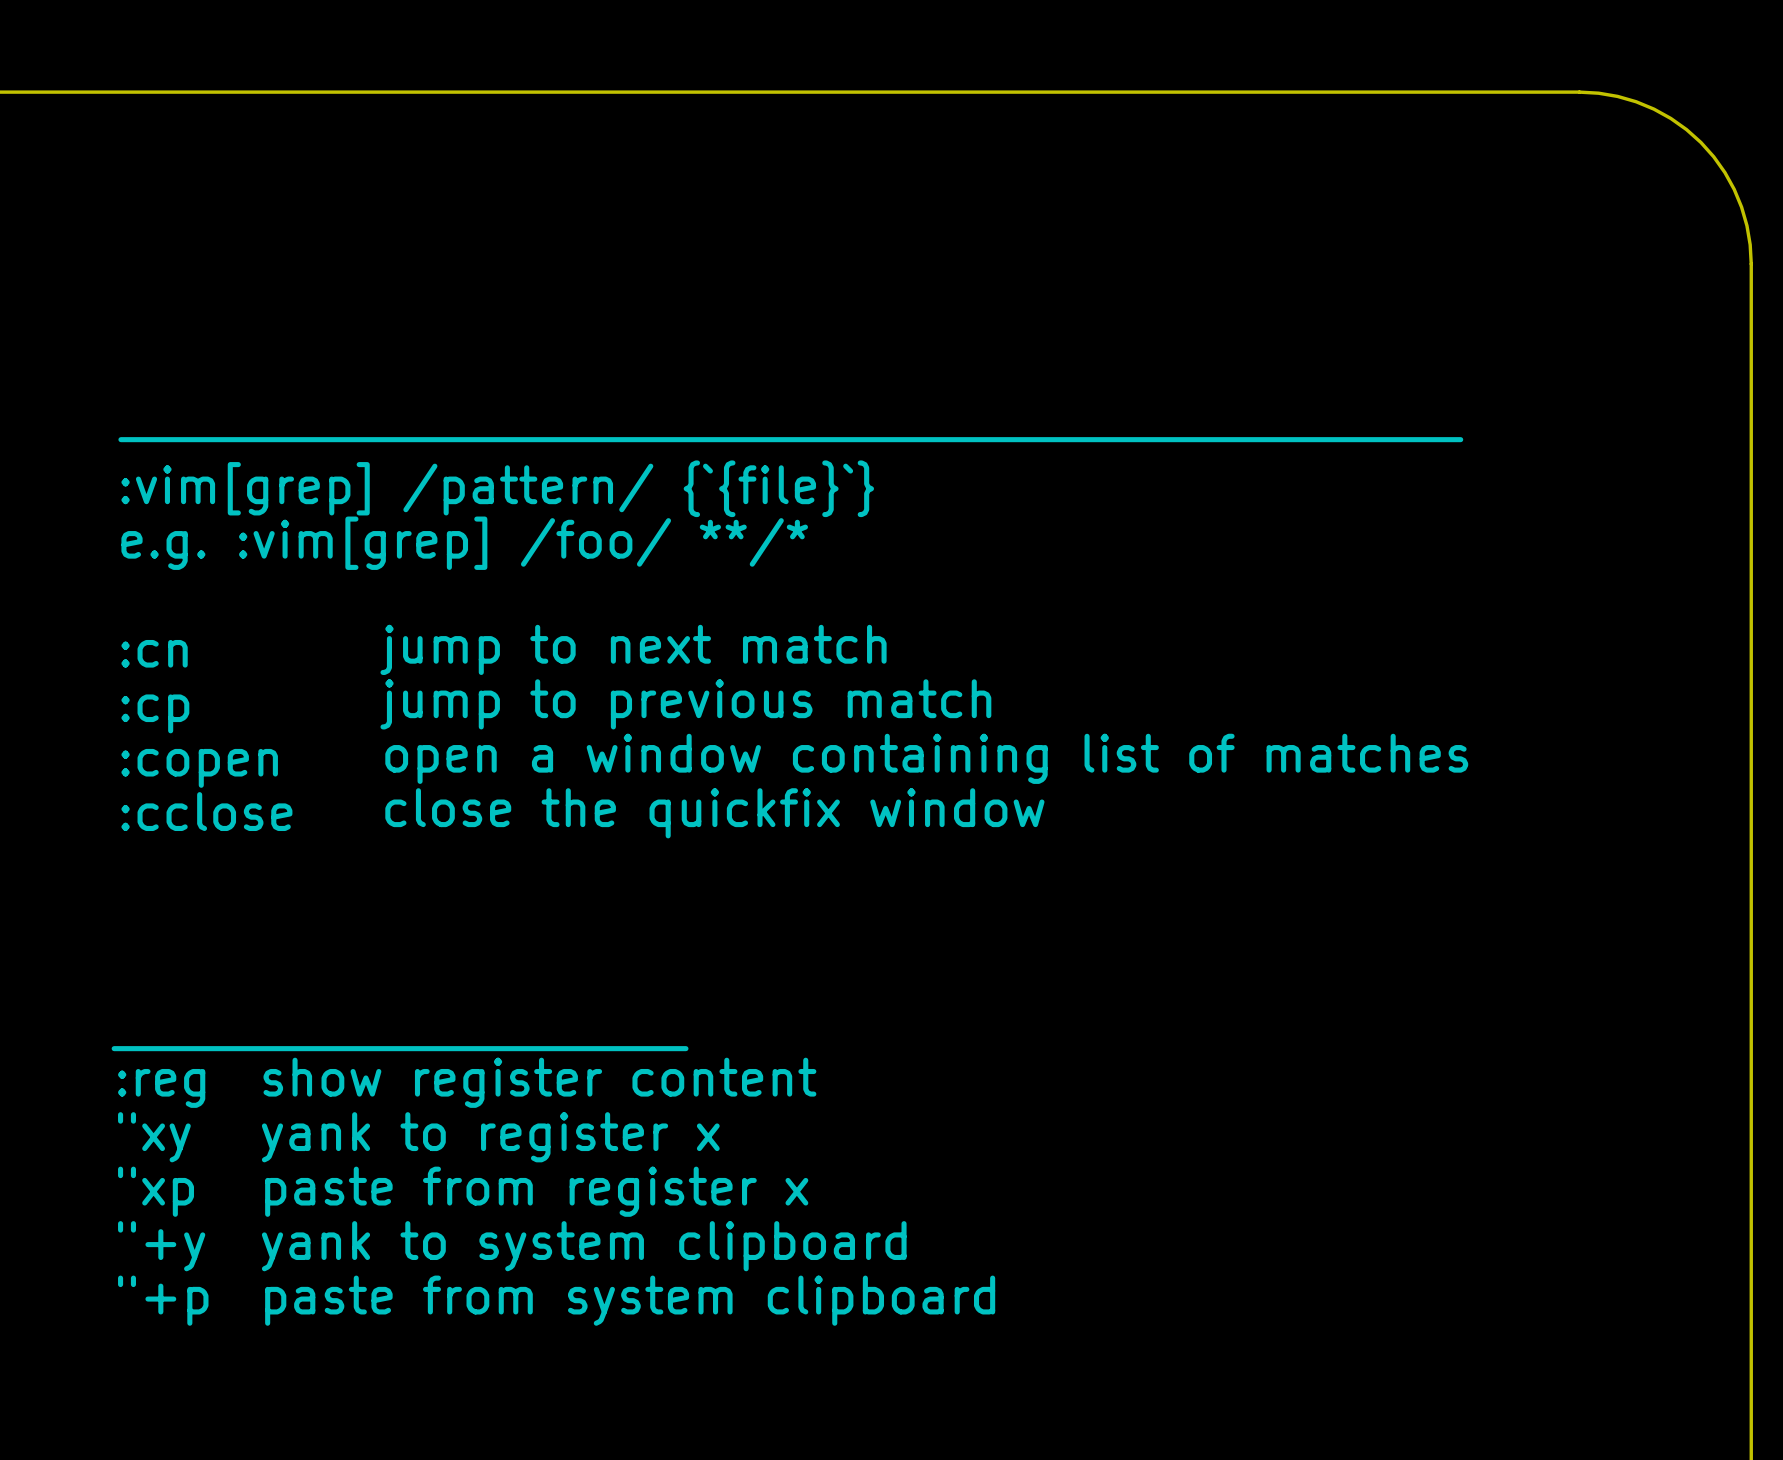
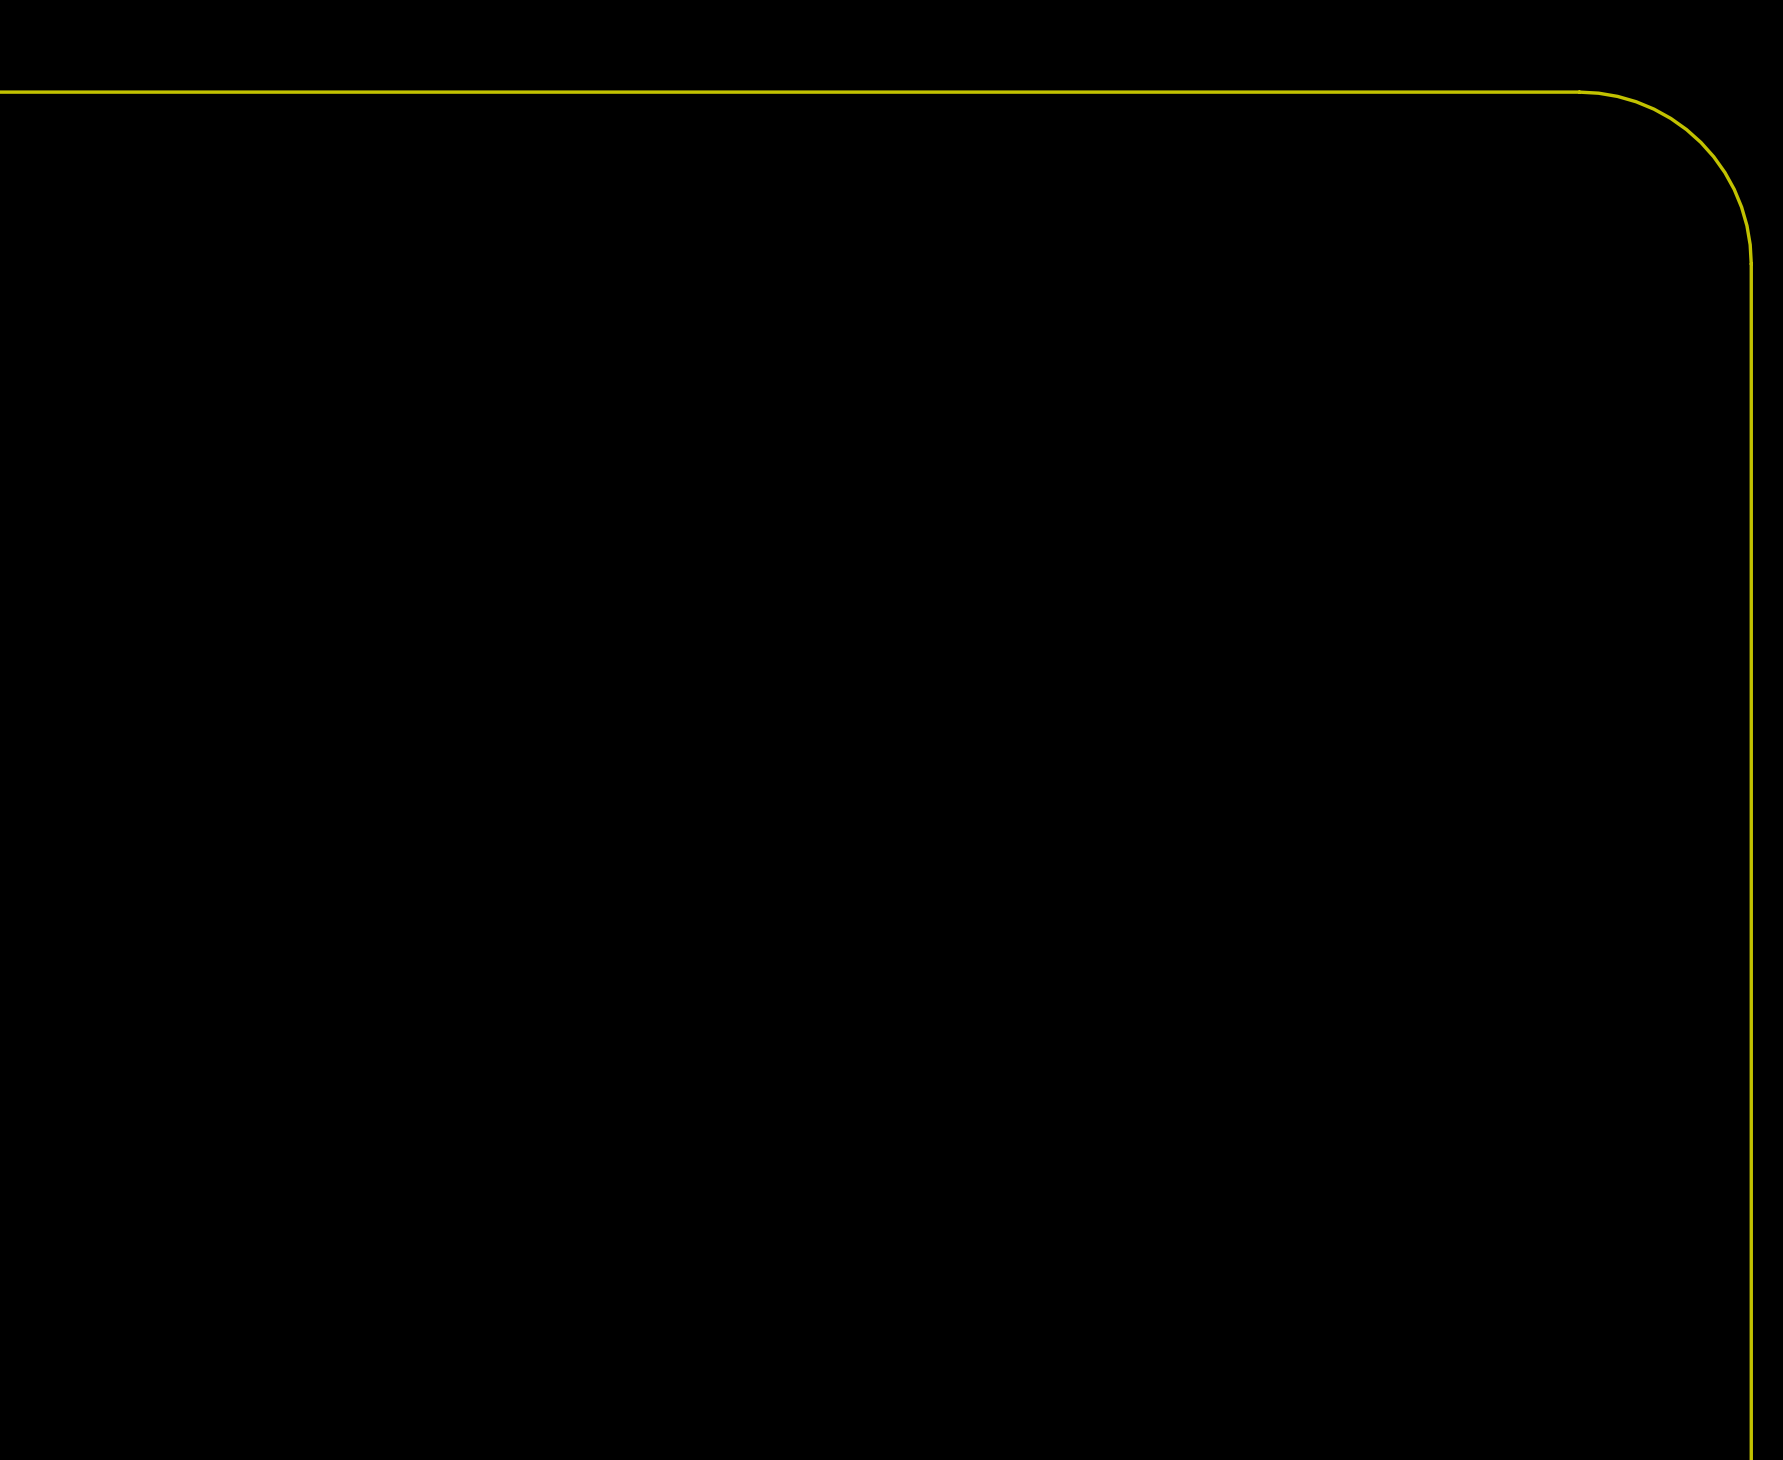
line: (1460, 439) (120, 439) -> none
text: :vim[grep] /pattern/ {`{file}`} (497, 488) -> none
text: e.g. :vim[grep] /foo/ **/* (464, 543) -> none
text: jump to next match (633, 649) -> none
text: :cn (154, 653) -> none
text: jump to previous match (685, 704) -> none
text: :cp (155, 713) -> none
text: open a window containing list of matches (926, 758) -> none
text: :copen (199, 768) -> none
text: :cclose (206, 811) -> none
text: close the quickfix window (714, 813) -> none
line: (685, 1048) (114, 1048) -> none
text: show register content (539, 1082) -> none
text: :reg (161, 1088) -> none
text: "xy (154, 1137) -> none
text: yank to register x (490, 1137) -> none
text: "xp (156, 1191) -> none
text: paste from register x (536, 1191) -> none
text: "+y (161, 1246) -> none
text: yank to system clipboard (584, 1246) -> none
text: "+p (163, 1300) -> none
text: paste from system clipboard (630, 1300) -> none

